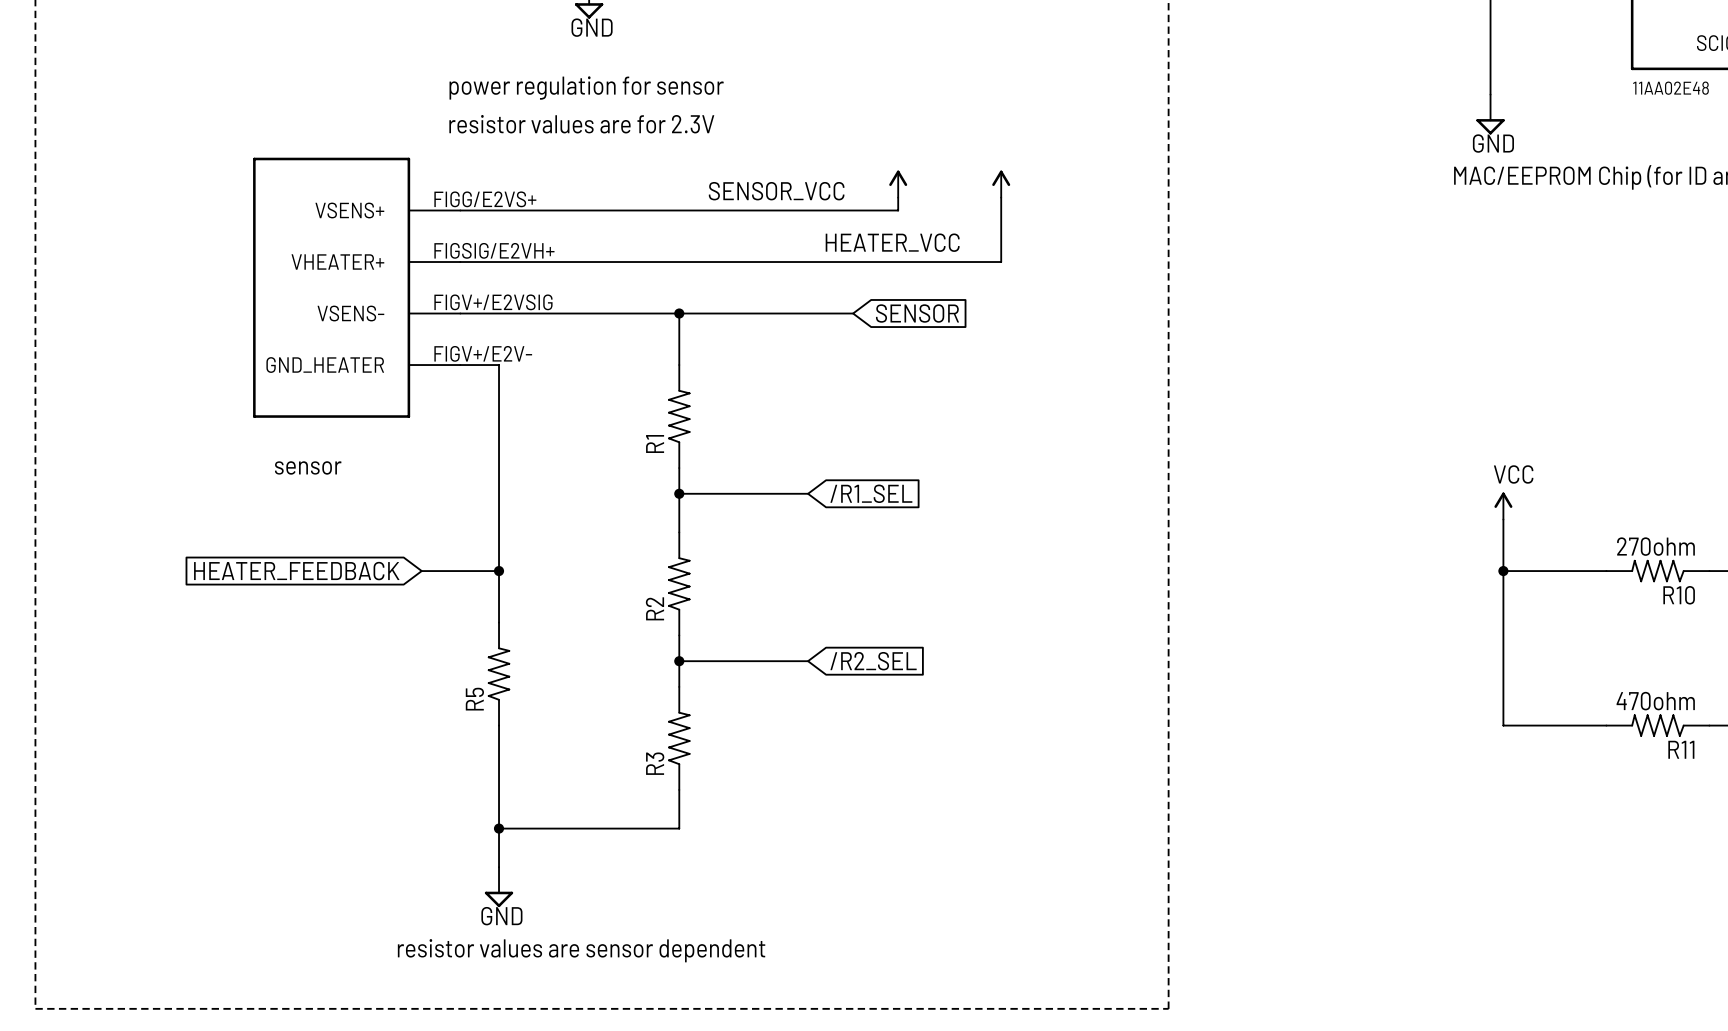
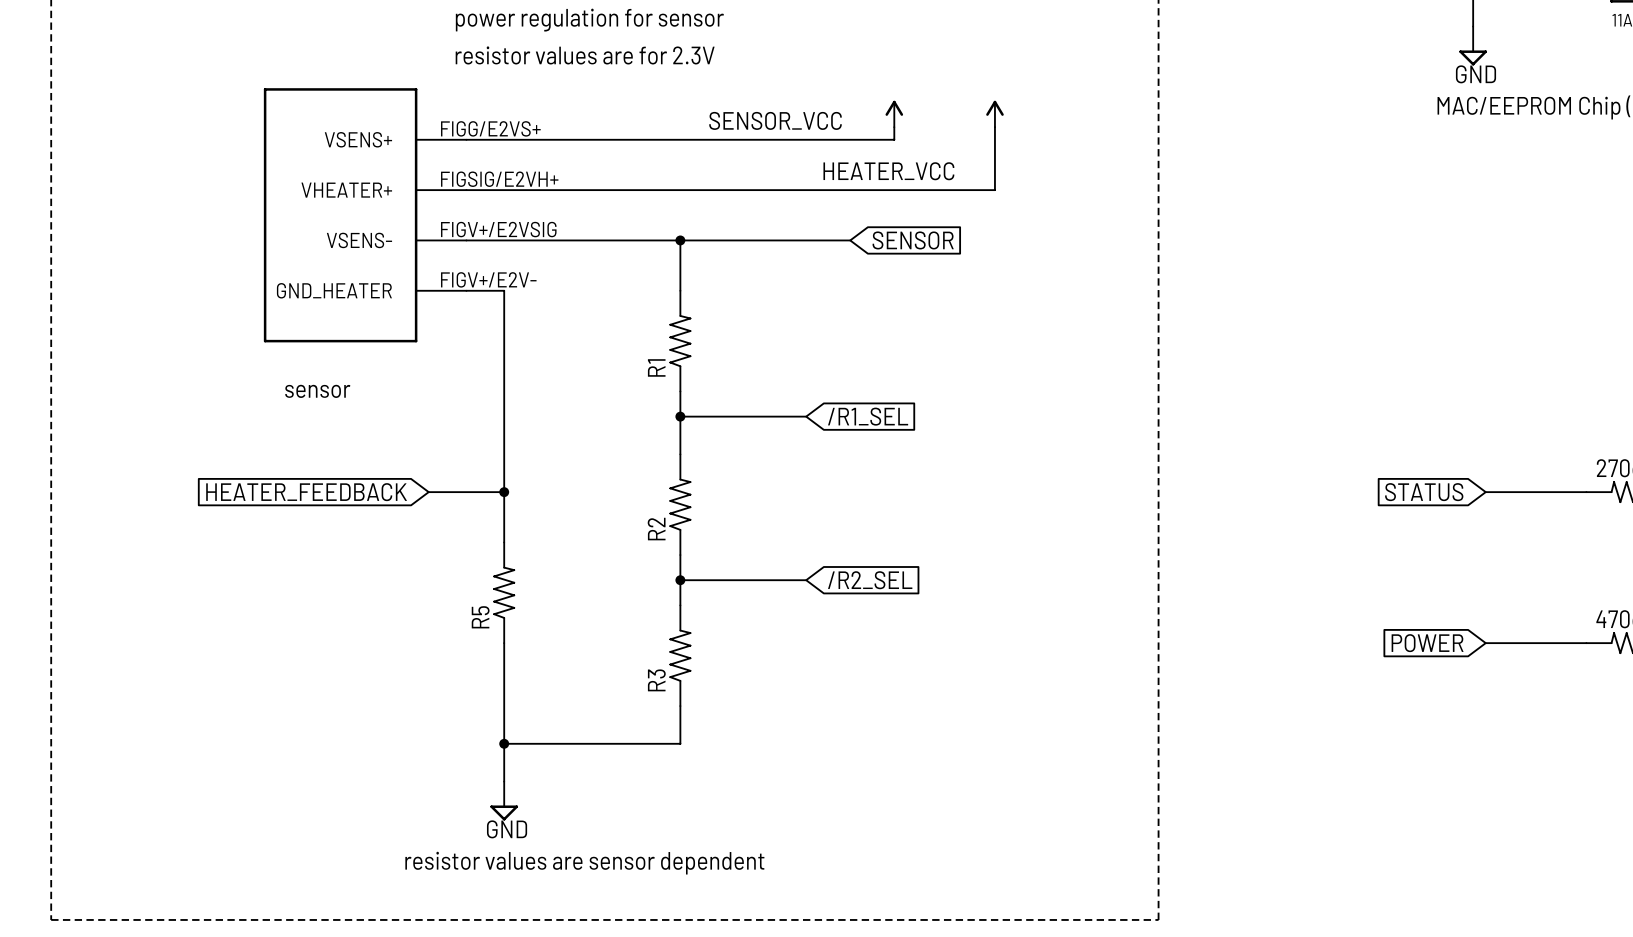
power symbol: VCC (1503, 506) -> none
wire: (1503, 519) (1503, 725) -> none
global label: none -> STATUS (1424, 492)
junction: (1503, 571) -> none
global label: none -> POWER (1427, 643)

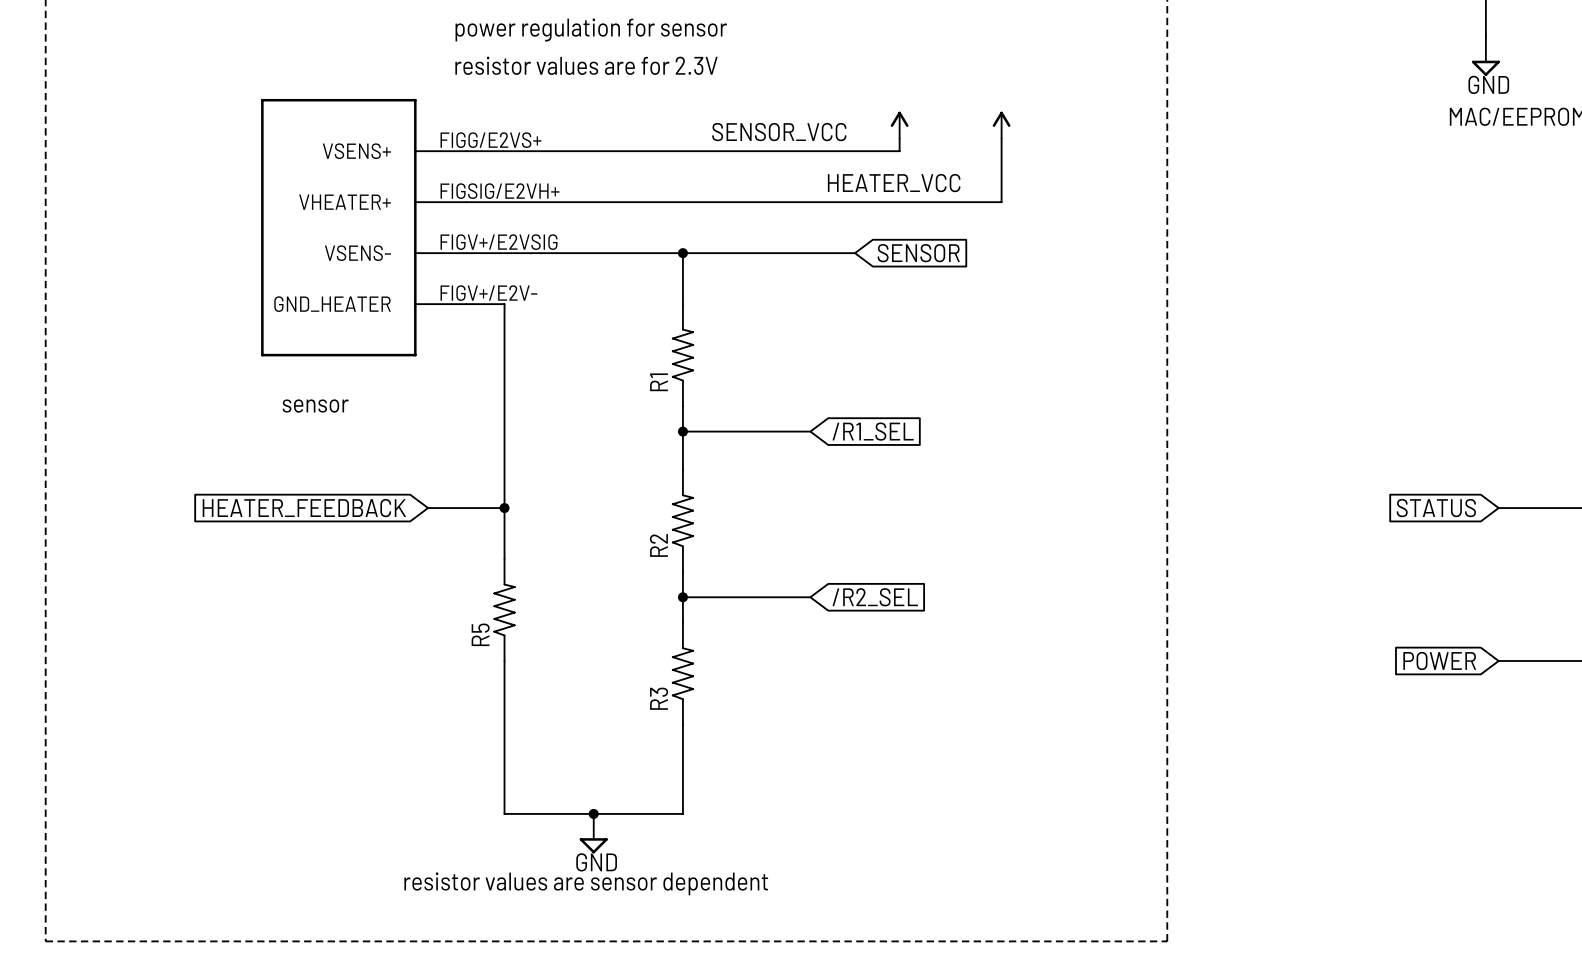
wire: (504, 743) (680, 743) -> (504, 801) (504, 813) (682, 813) (682, 762)
junction: (504, 743) -> none
junction: none -> (593, 813)
power symbol position: GND (504, 801) -> GND (593, 833)

